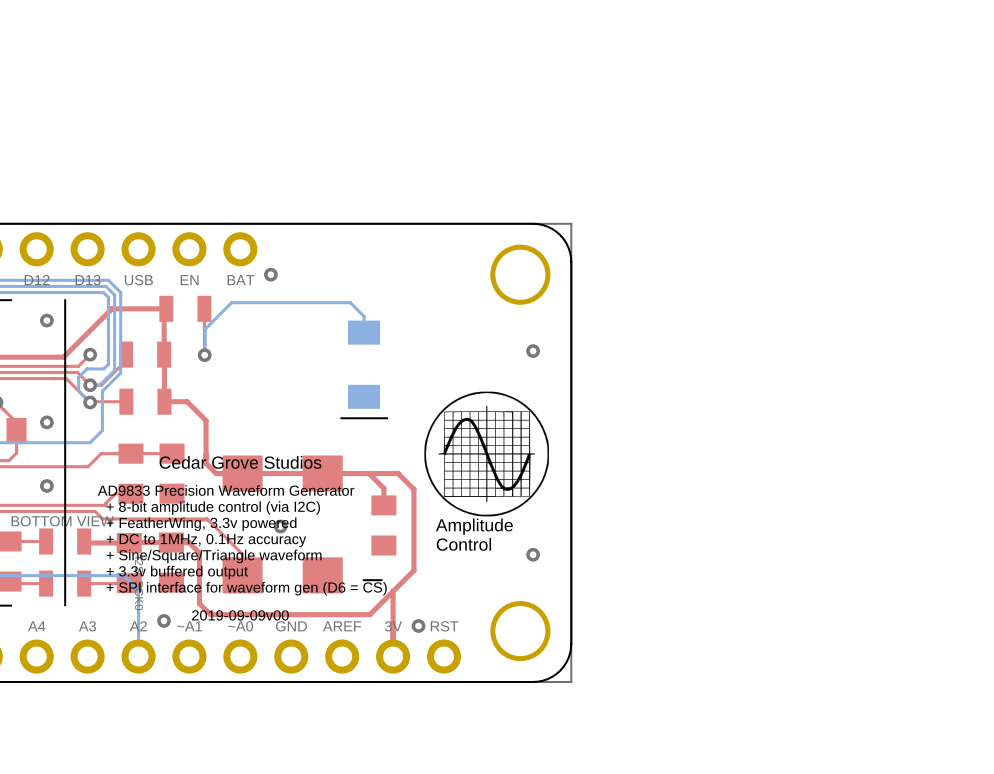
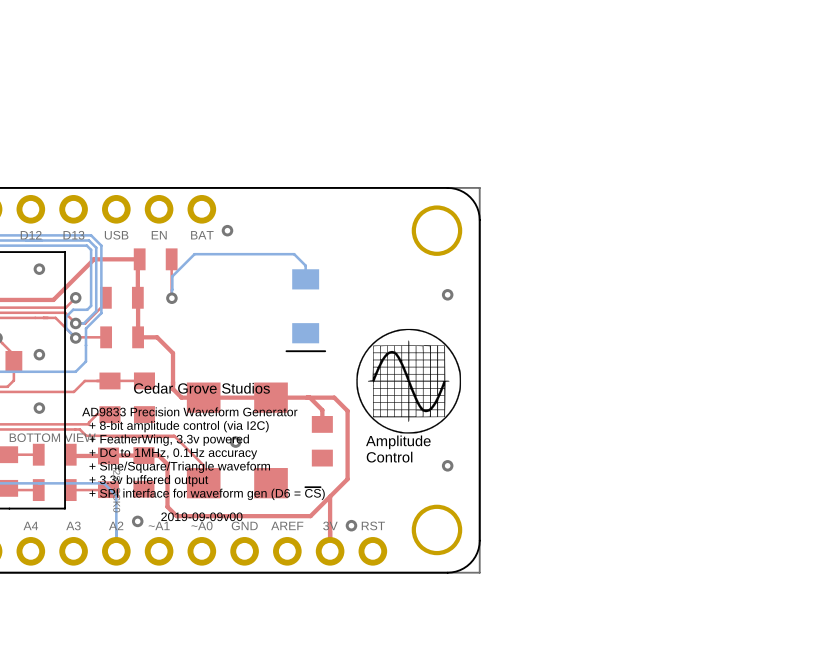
line: (65, 299) (65, 605) -> none
line: none -> (9, 252) (65, 252) (65, 508) (9, 508)

